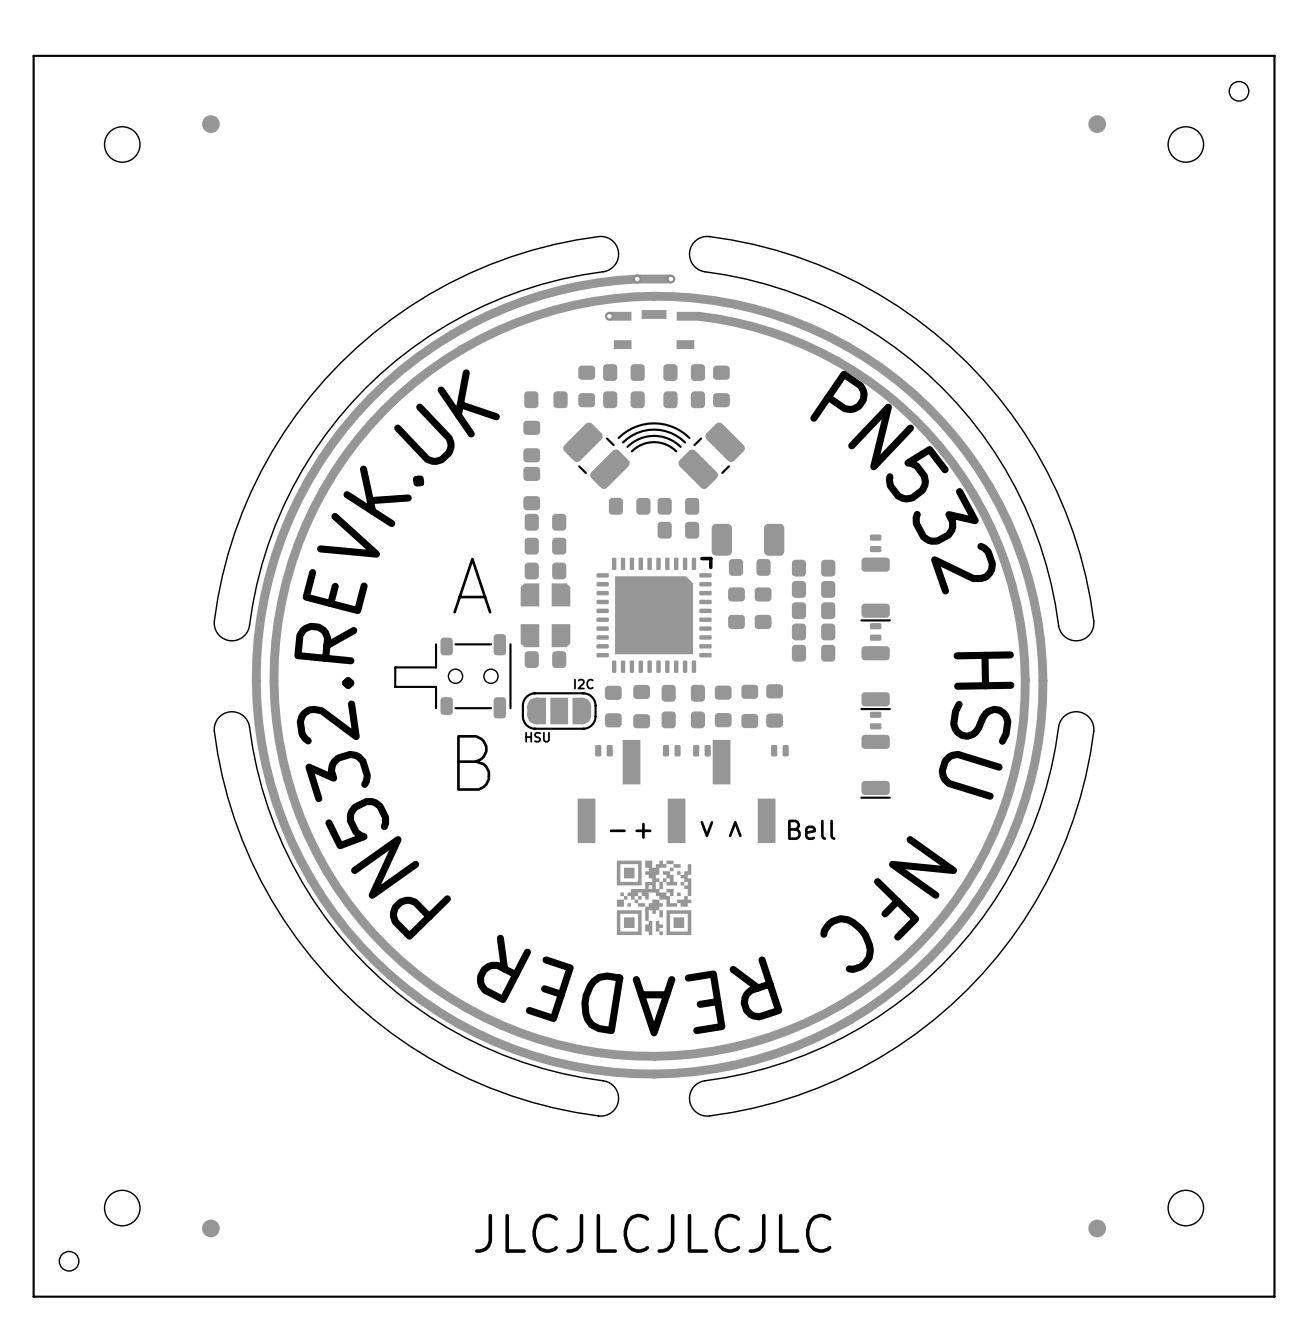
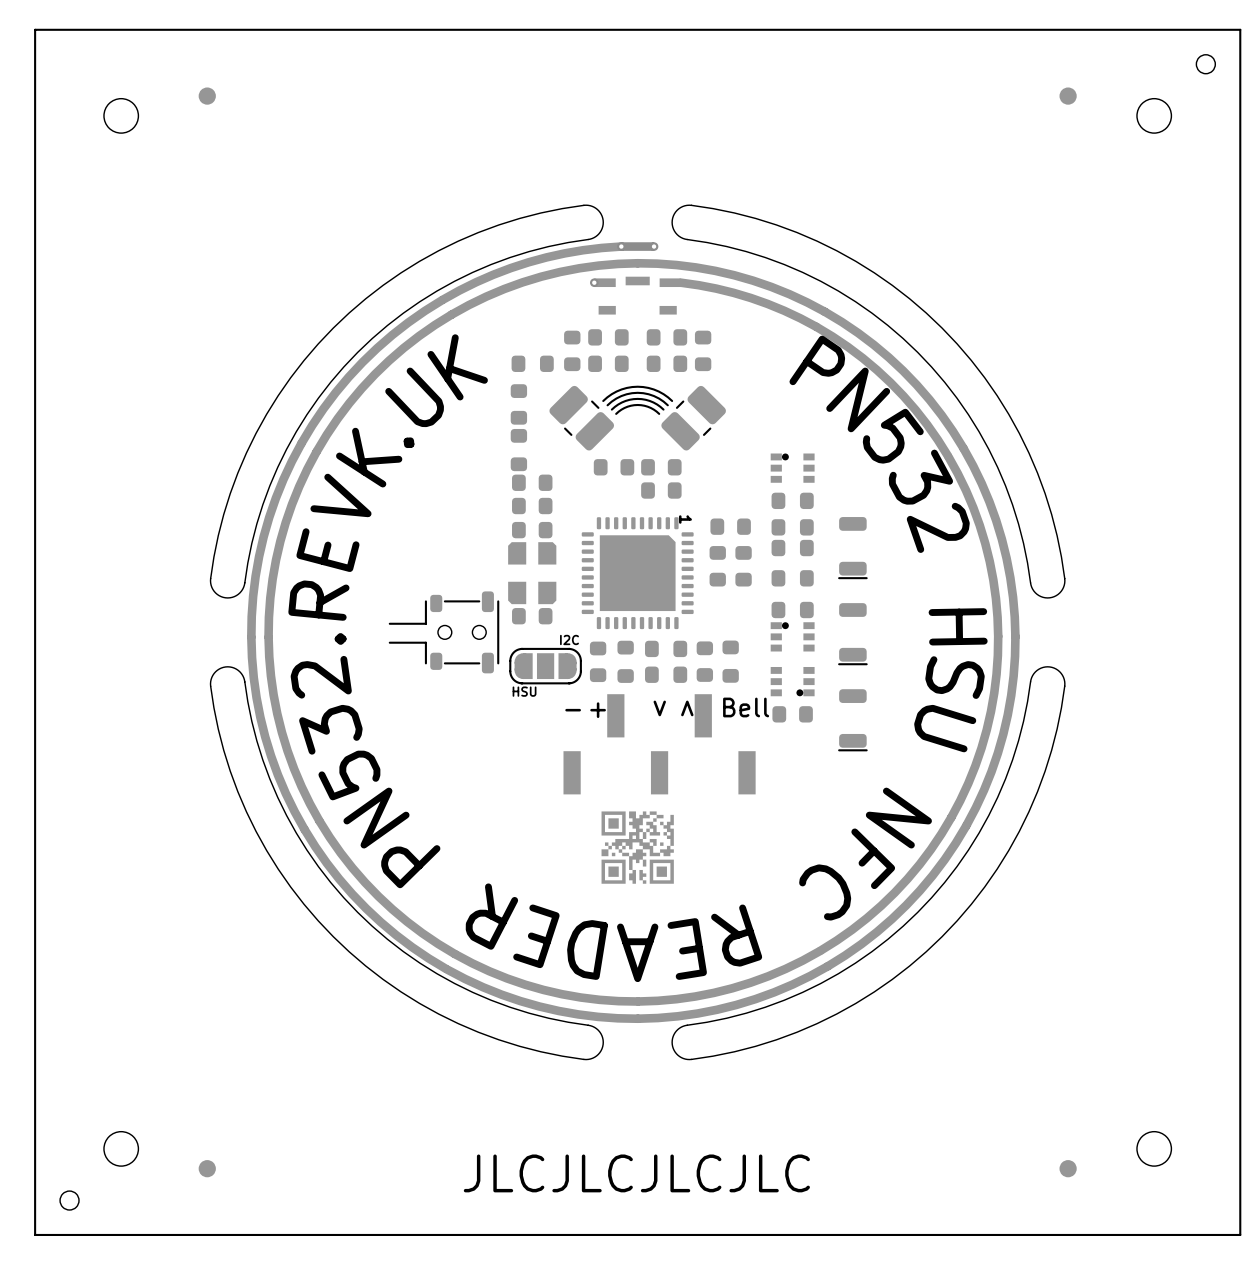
part: none -> (792, 468)
part: (748, 539) -> none
part: none -> (792, 500)
part: (875, 543) -> none
part footprint: [596, 556, 713, 673] -> [581, 517, 694, 630]
text: A (472, 585) -> none
part: (813, 610) -> none
part: none -> (792, 578)
part: (813, 631) -> none
part: (875, 631) -> none
part footprint: [394, 634, 512, 719] -> [388, 591, 500, 674]
part: none -> (792, 636)
part: (774, 705) -> none
part: (875, 720) -> none
part: none -> (792, 681)
part: (603, 750) -> none
part: (671, 750) -> none
part: (701, 750) -> none
part: (779, 750) -> none
part: none -> (792, 714)
text: B (473, 762) -> none
text position: < (706, 829) -> < (659, 708)
text position: > (735, 829) -> > (687, 708)
text position: Bell (811, 829) -> Bell (746, 707)
text position: - (617, 830) -> - (573, 710)
text position: + (643, 830) -> + (598, 710)

